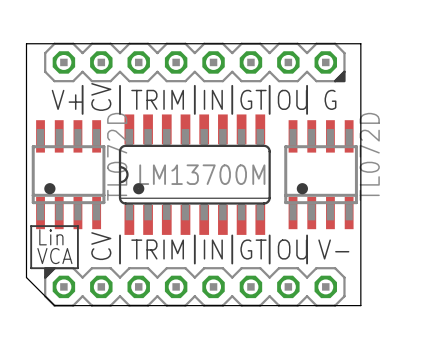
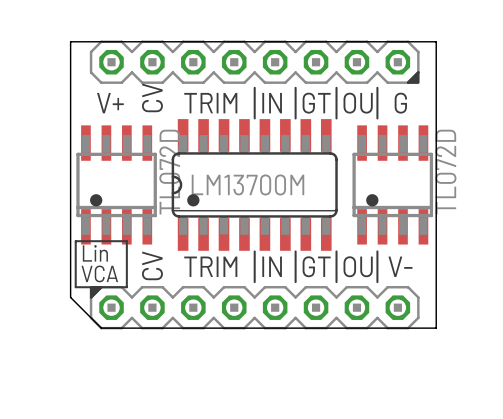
line: (82, 85) (82, 113) -> none
line: (120, 85) (120, 113) -> none
line: (120, 235) (120, 263) -> none

